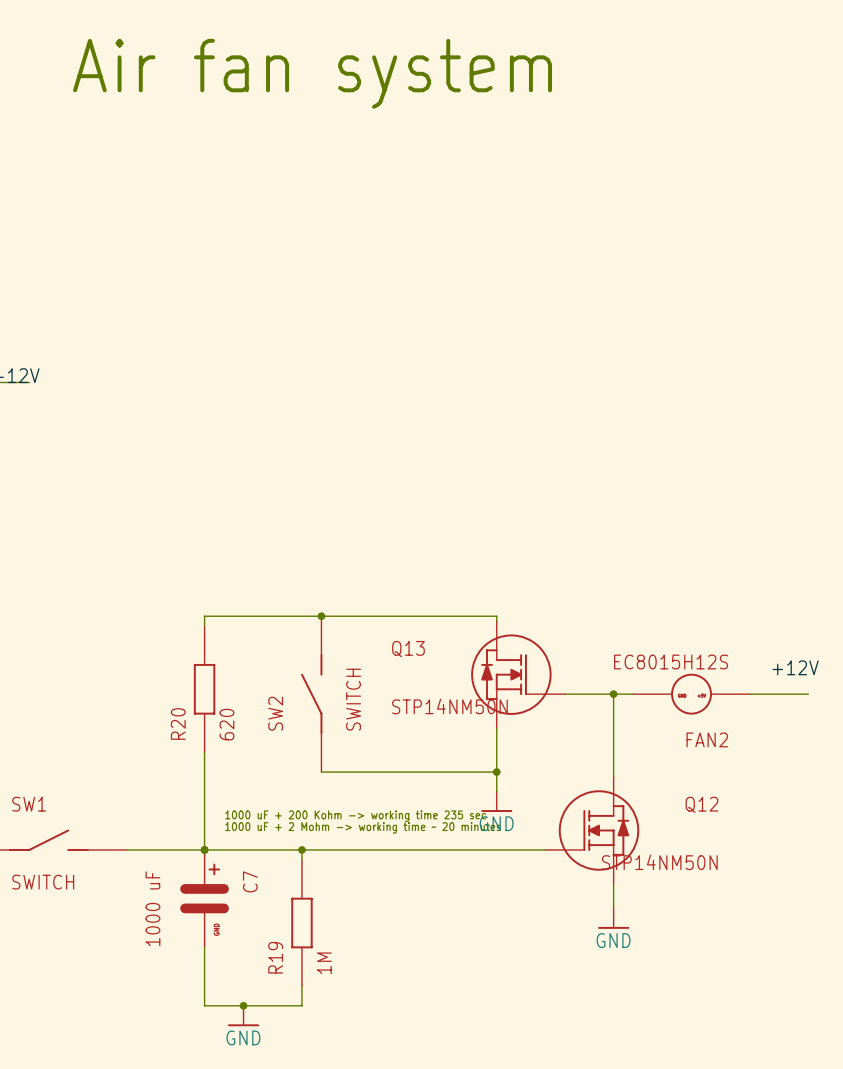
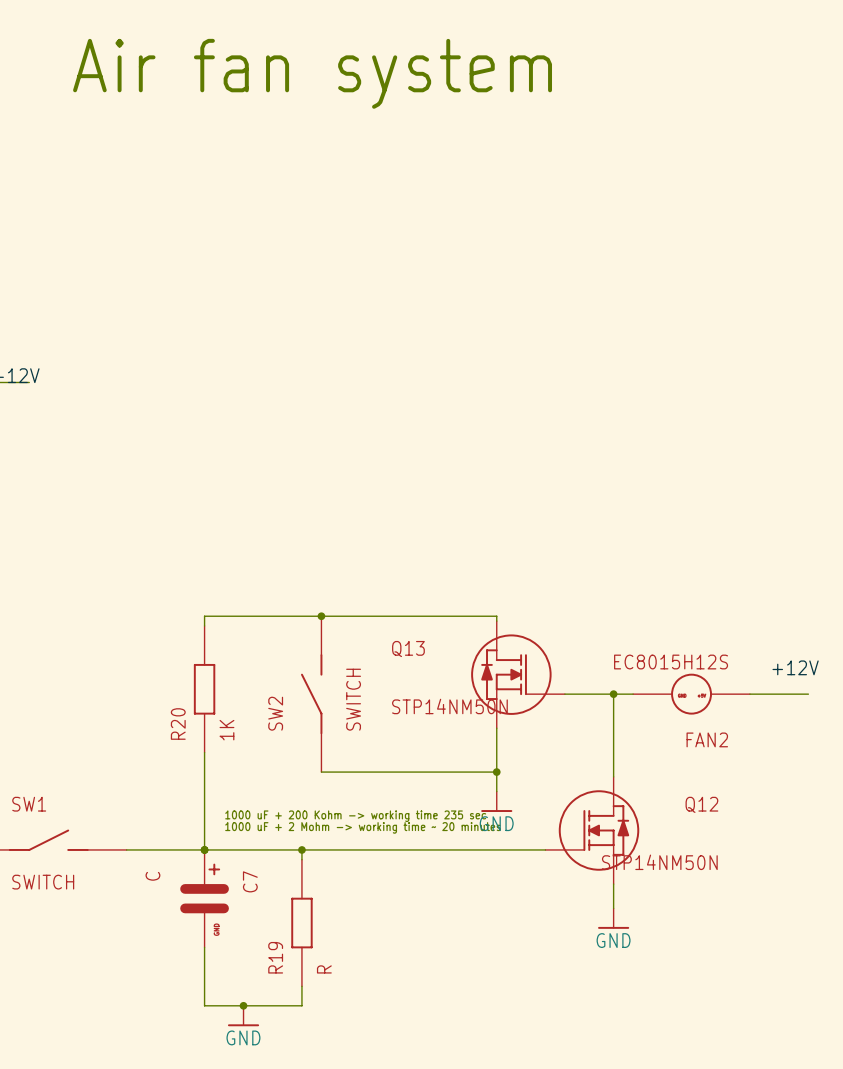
R20 value: 620 (226, 724) -> 1K (226, 730)
C7 value: 1000 uF (152, 908) -> C (152, 876)
R19 value: 1M (324, 963) -> R (324, 969)

